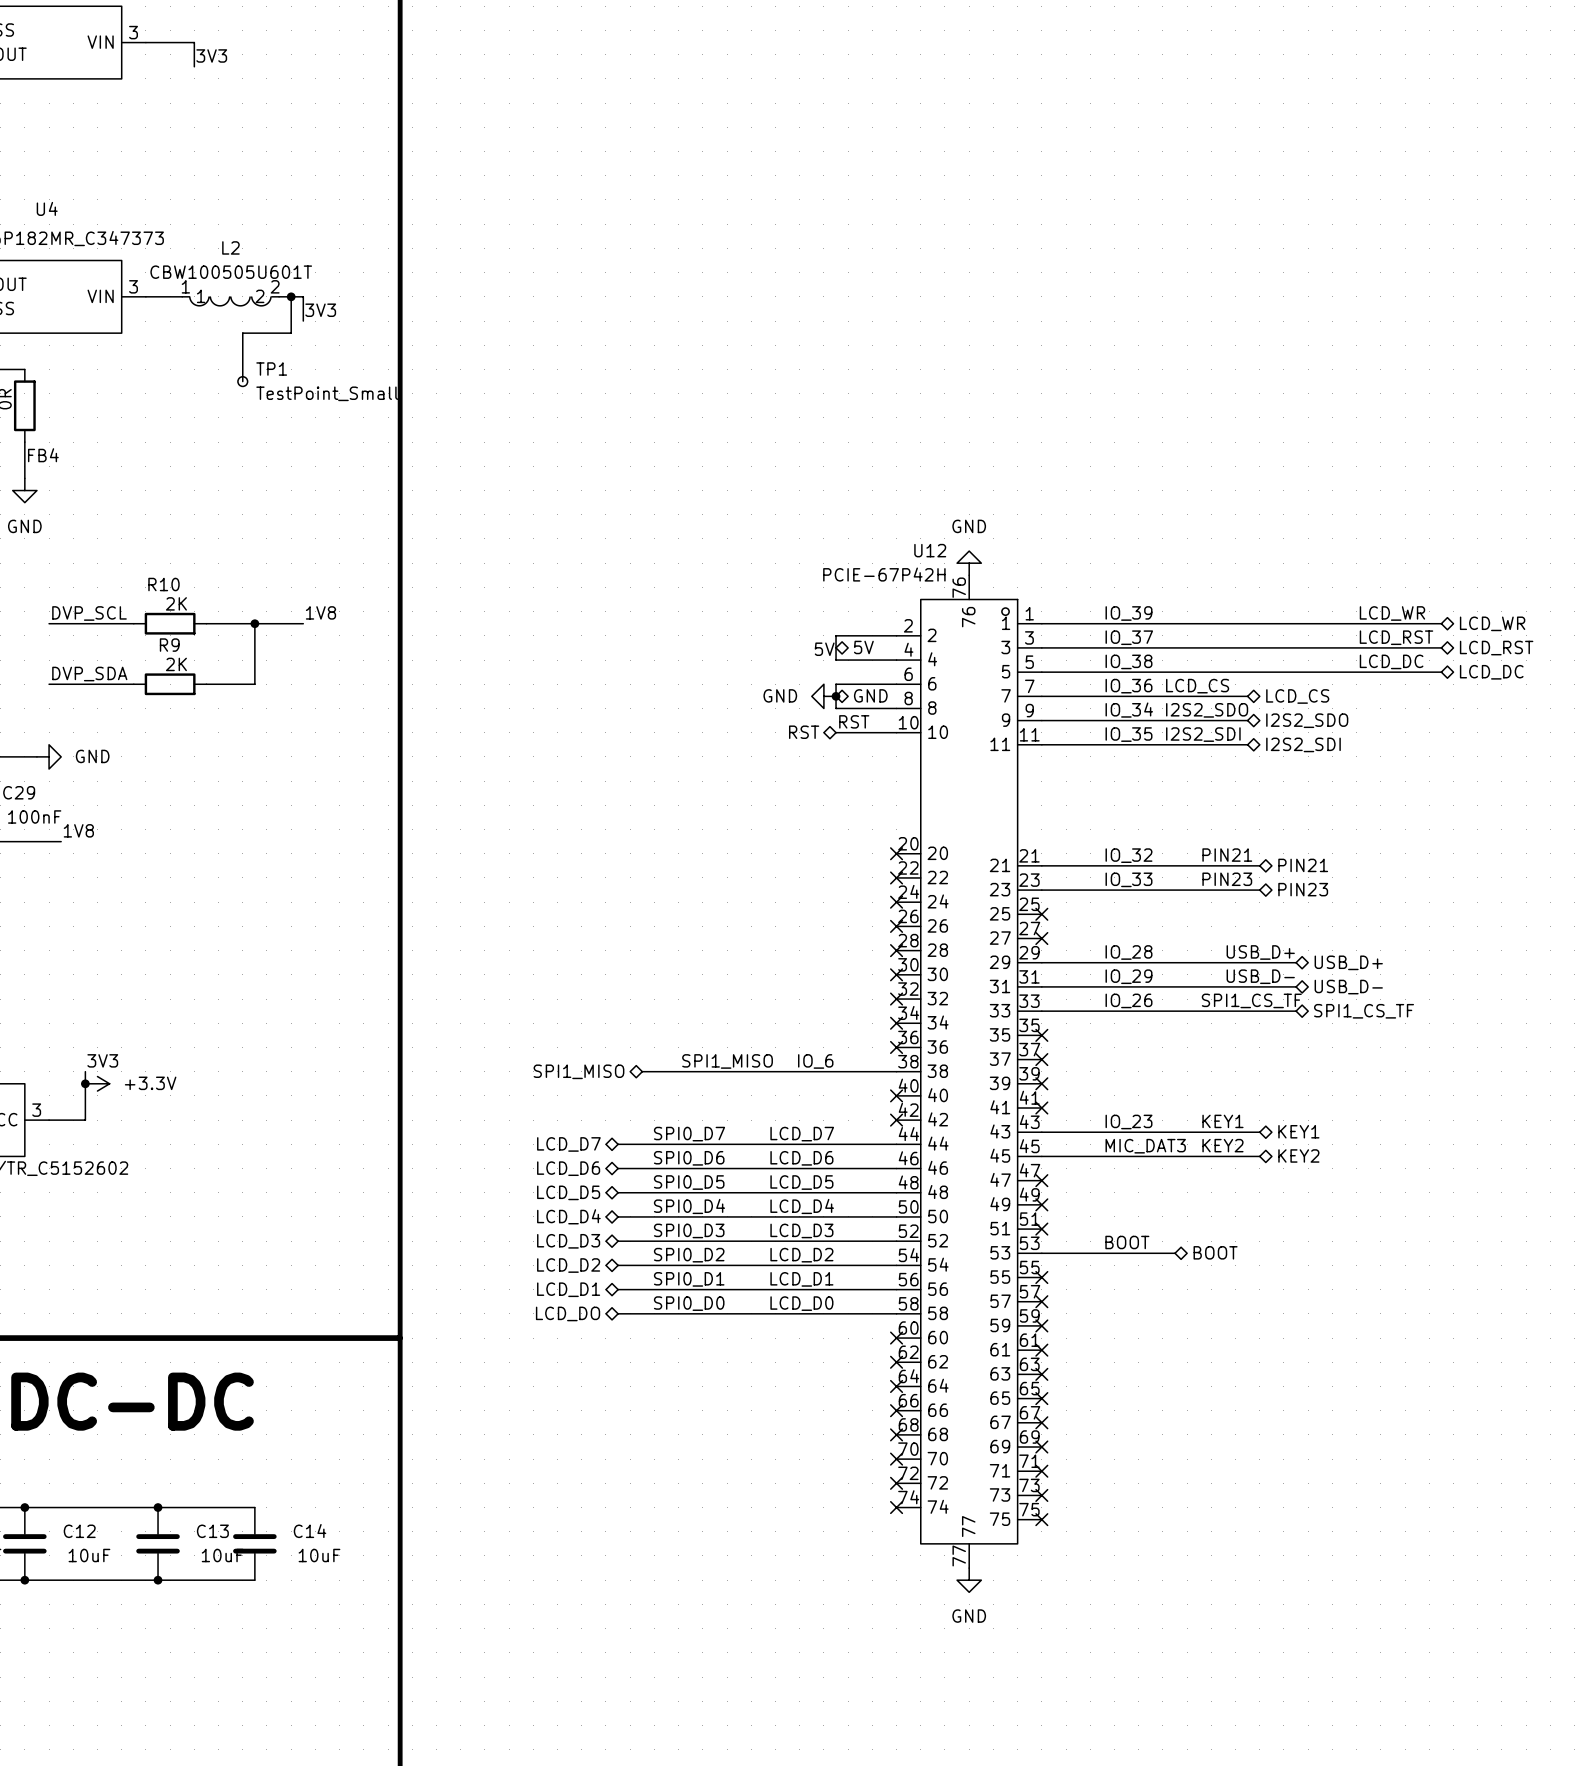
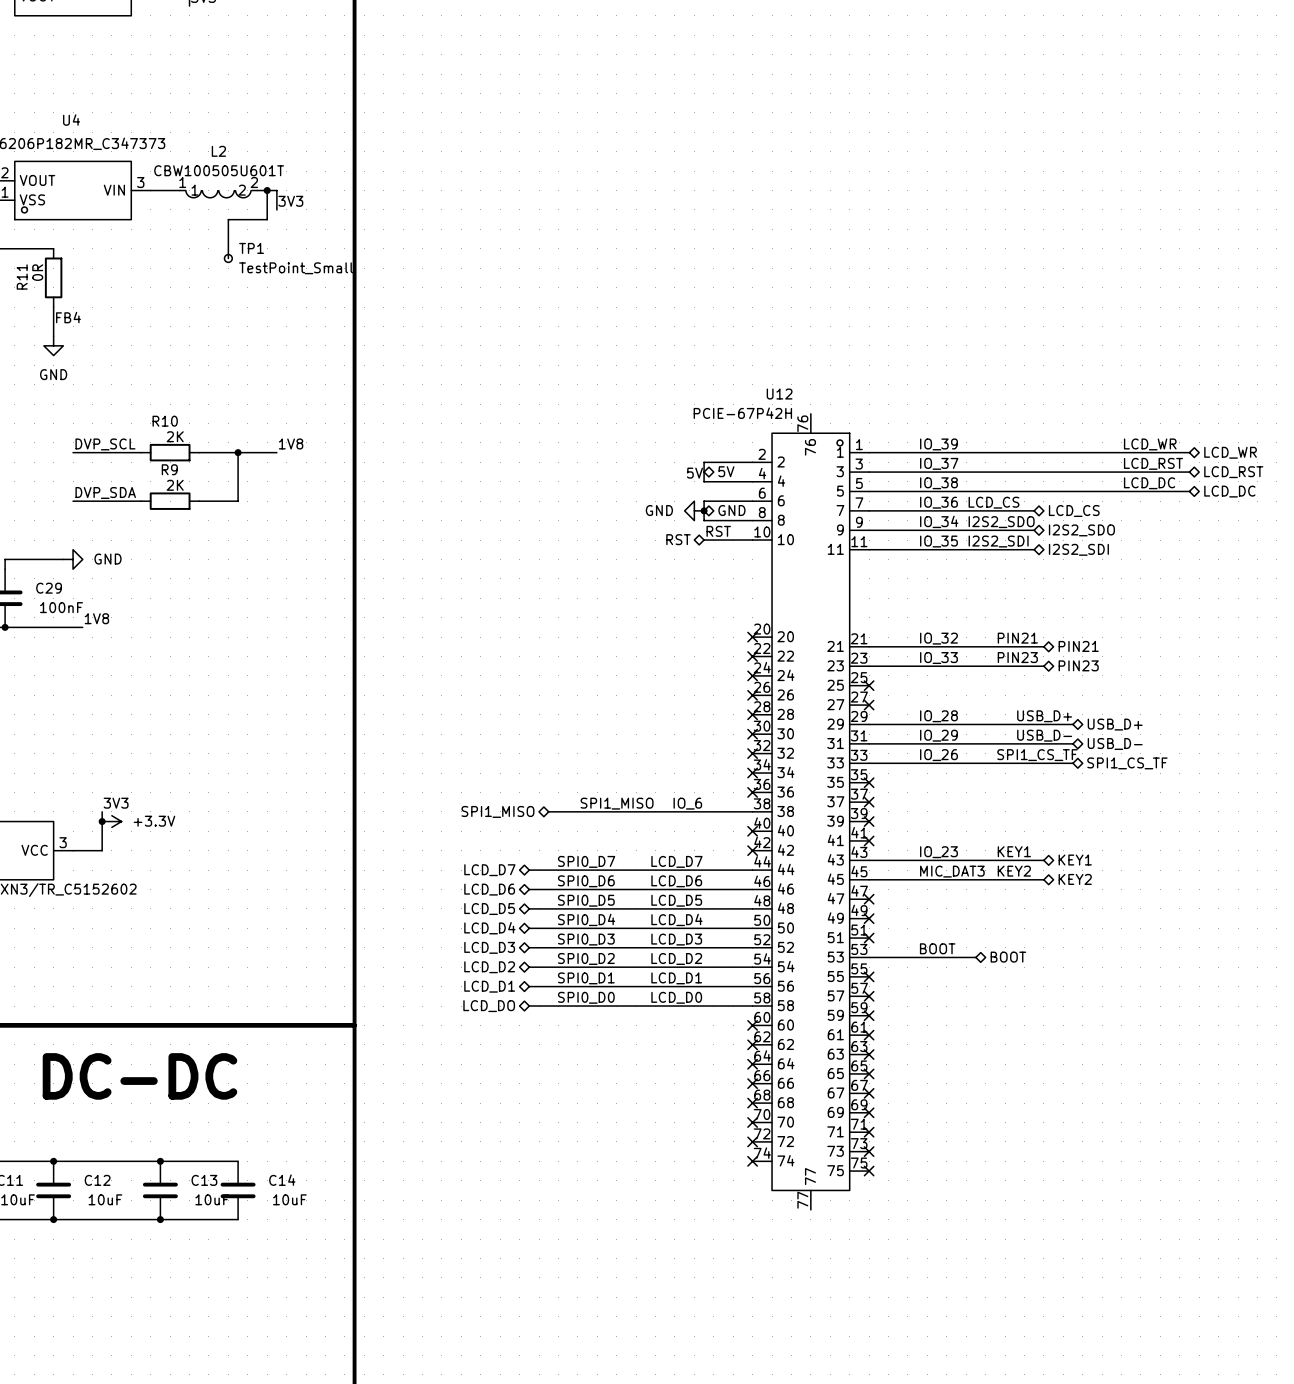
power symbol: GND (969, 563) -> none
power symbol: GND (969, 1580) -> none

